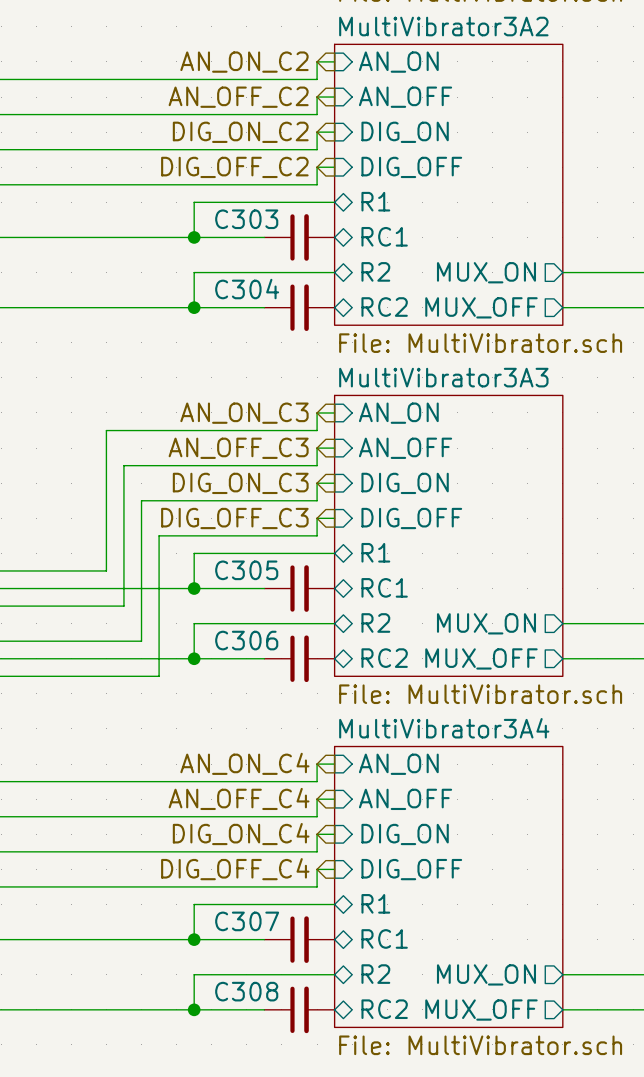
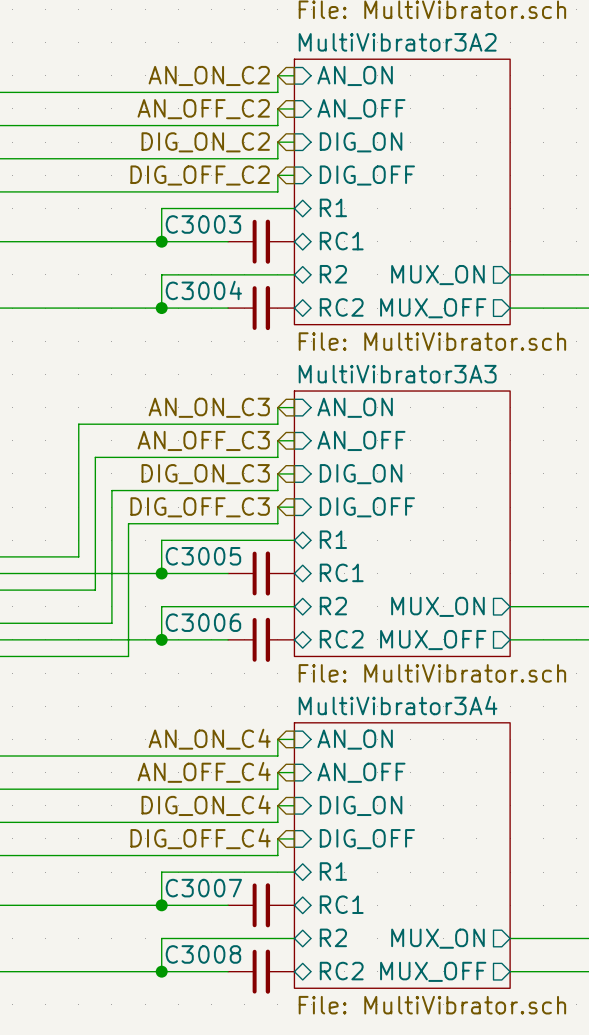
C303 name: C303 (246, 219) -> C3003 (203, 224)
C304 name: C304 (247, 289) -> C3004 (203, 290)
C305 name: C305 (246, 570) -> C3005 (203, 556)
C306 name: C306 (246, 640) -> C3006 (203, 622)
C307 name: C307 (247, 921) -> C3007 (203, 888)
C308 name: C308 (246, 991) -> C3008 (203, 954)

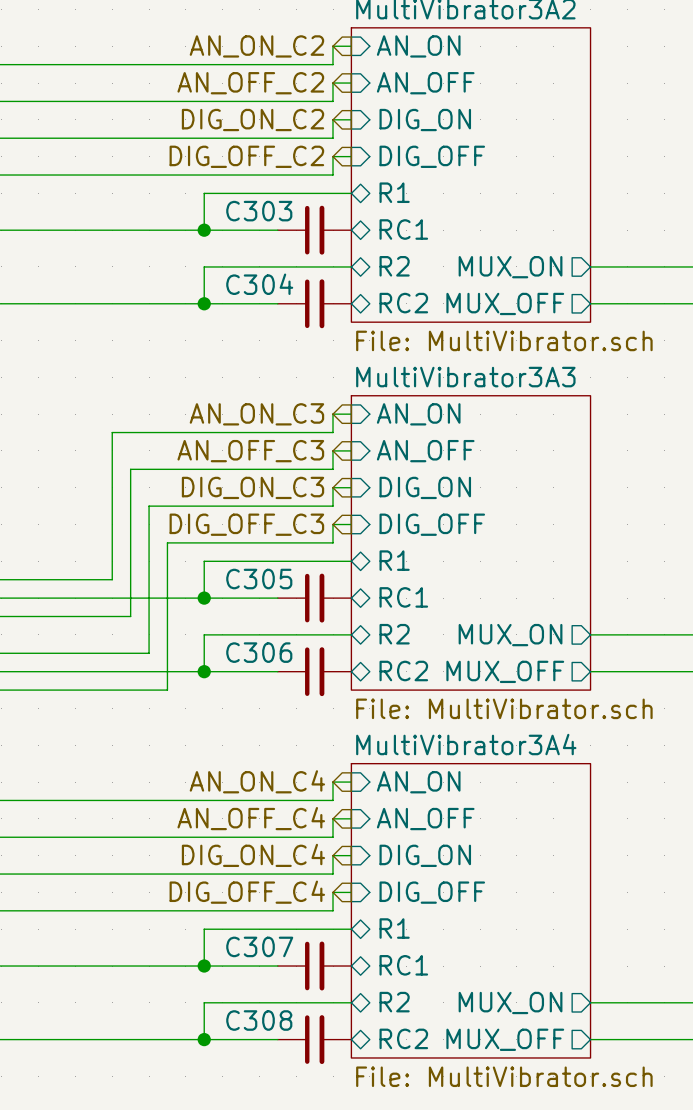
C3003 name: C3003 (203, 224) -> C303 (259, 211)
C3004 name: C3004 (203, 290) -> C304 (259, 284)
C3005 name: C3005 (203, 556) -> C305 (259, 579)
C3006 name: C3006 (203, 622) -> C306 (259, 652)
C3007 name: C3007 (203, 888) -> C307 (259, 946)
C3008 name: C3008 (203, 954) -> C308 (259, 1020)

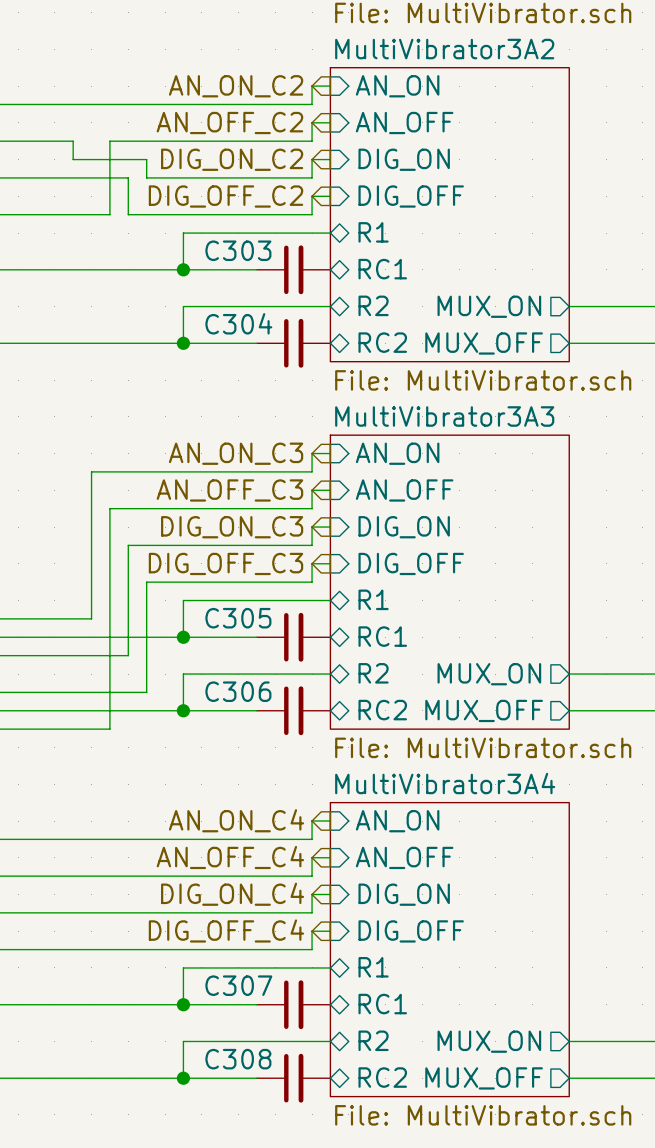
wire: (93, 101) (130, 101) -> (73, 141) (73, 159) (146, 159) (146, 177)
wire: (149, 138) (167, 138) -> (128, 177) (128, 214)
wire: (130, 175) (149, 175) -> (109, 214) (109, 141)
wire: (149, 616) (149, 653) -> (128, 655) (109, 655) (109, 729)
wire: (167, 653) (167, 690) (130, 690) -> (146, 692) (128, 692)

